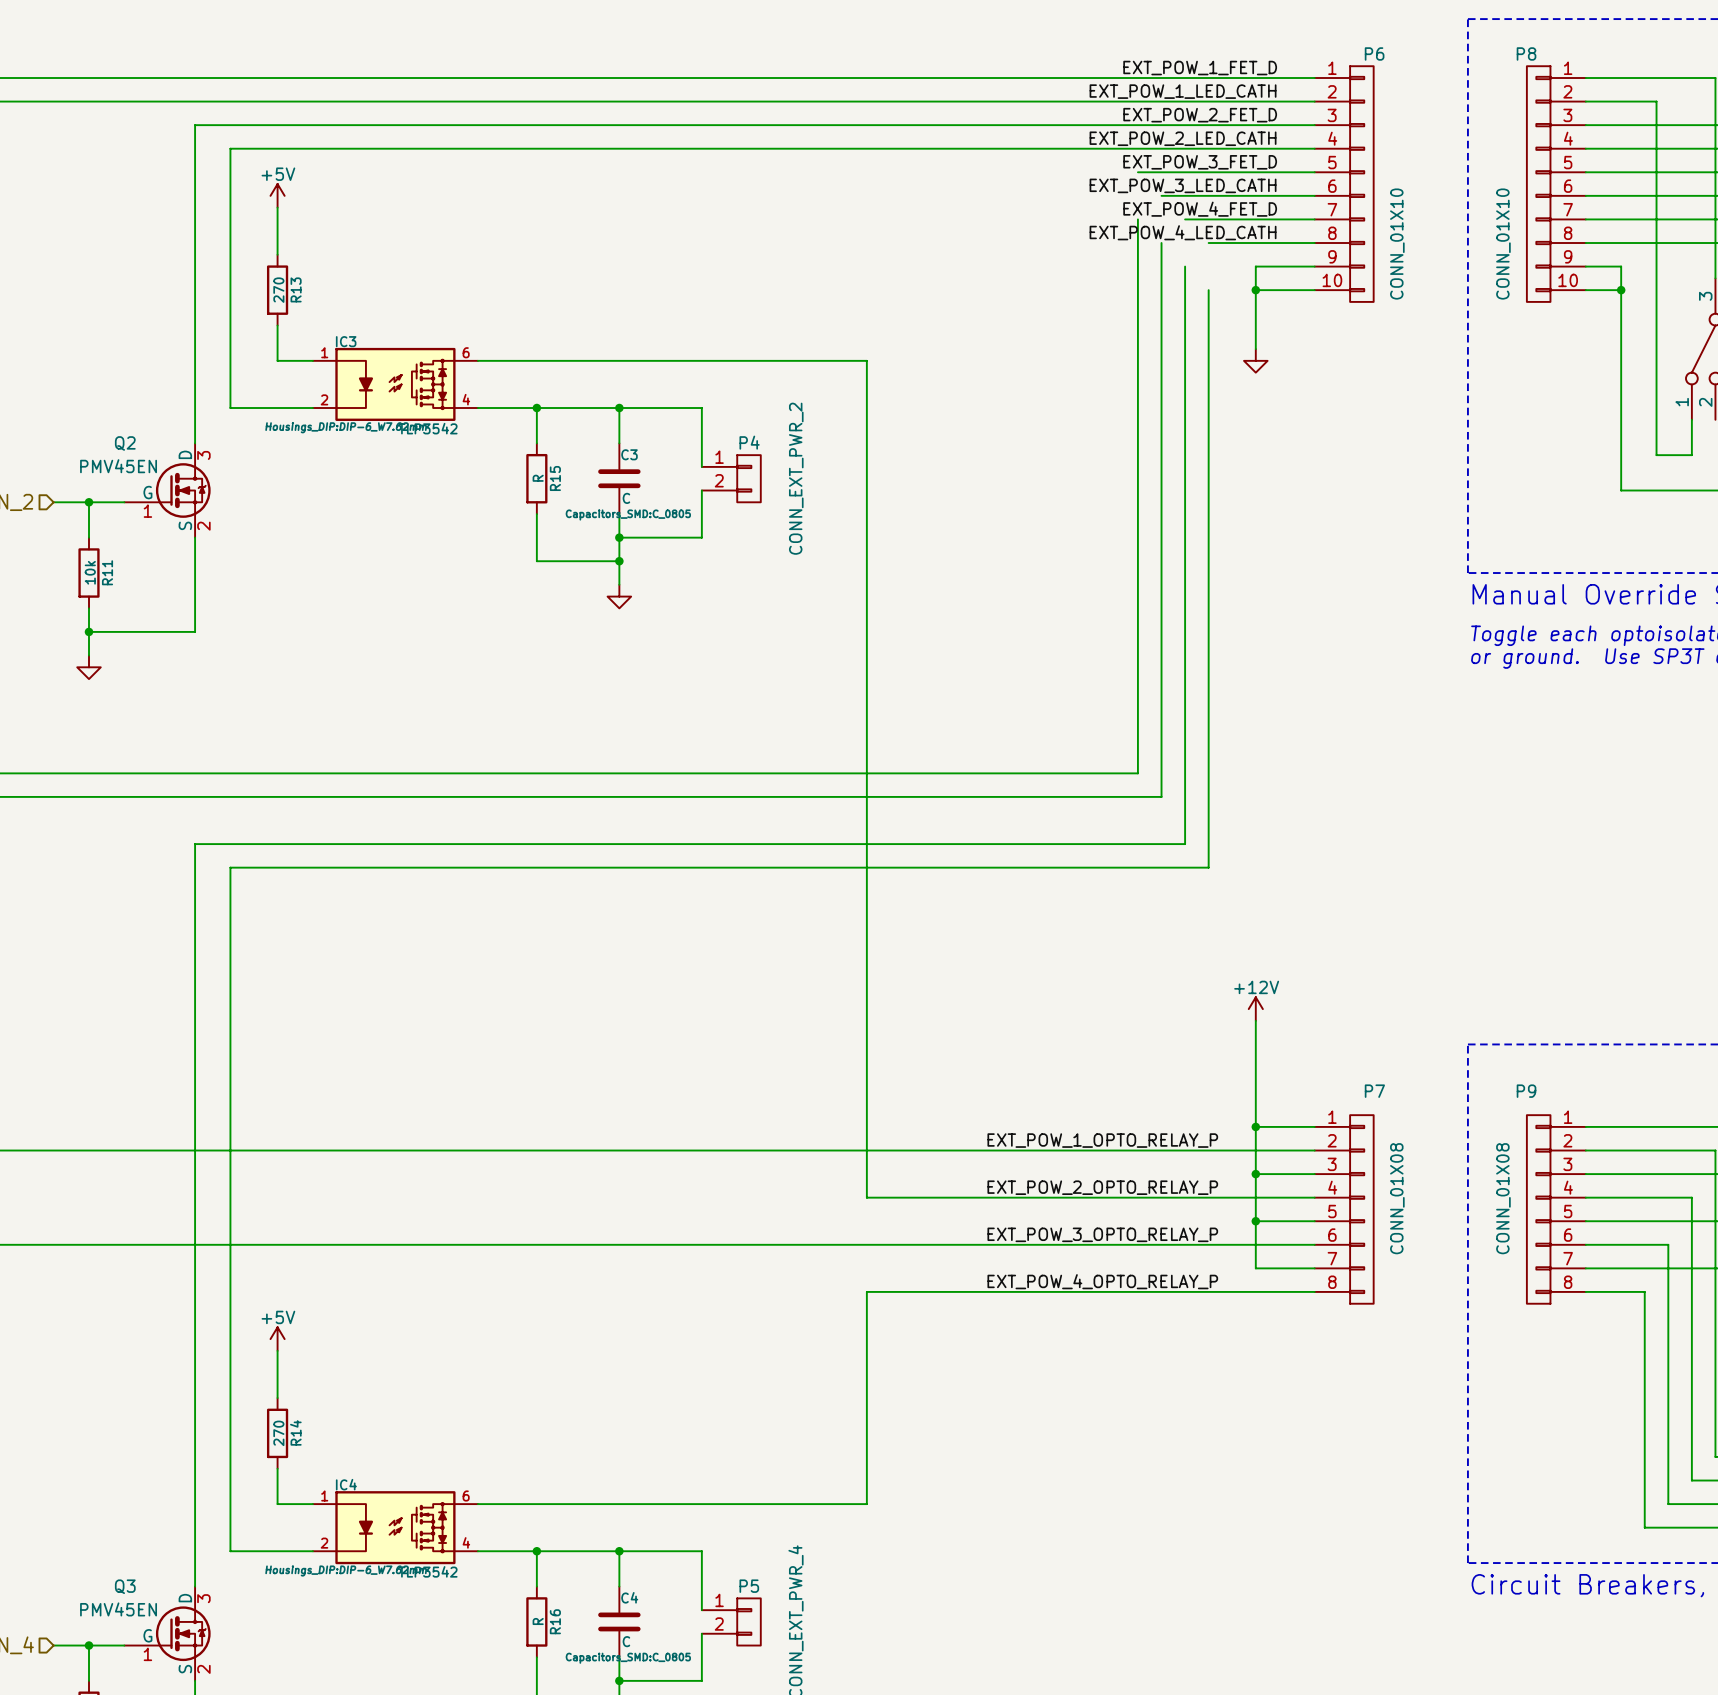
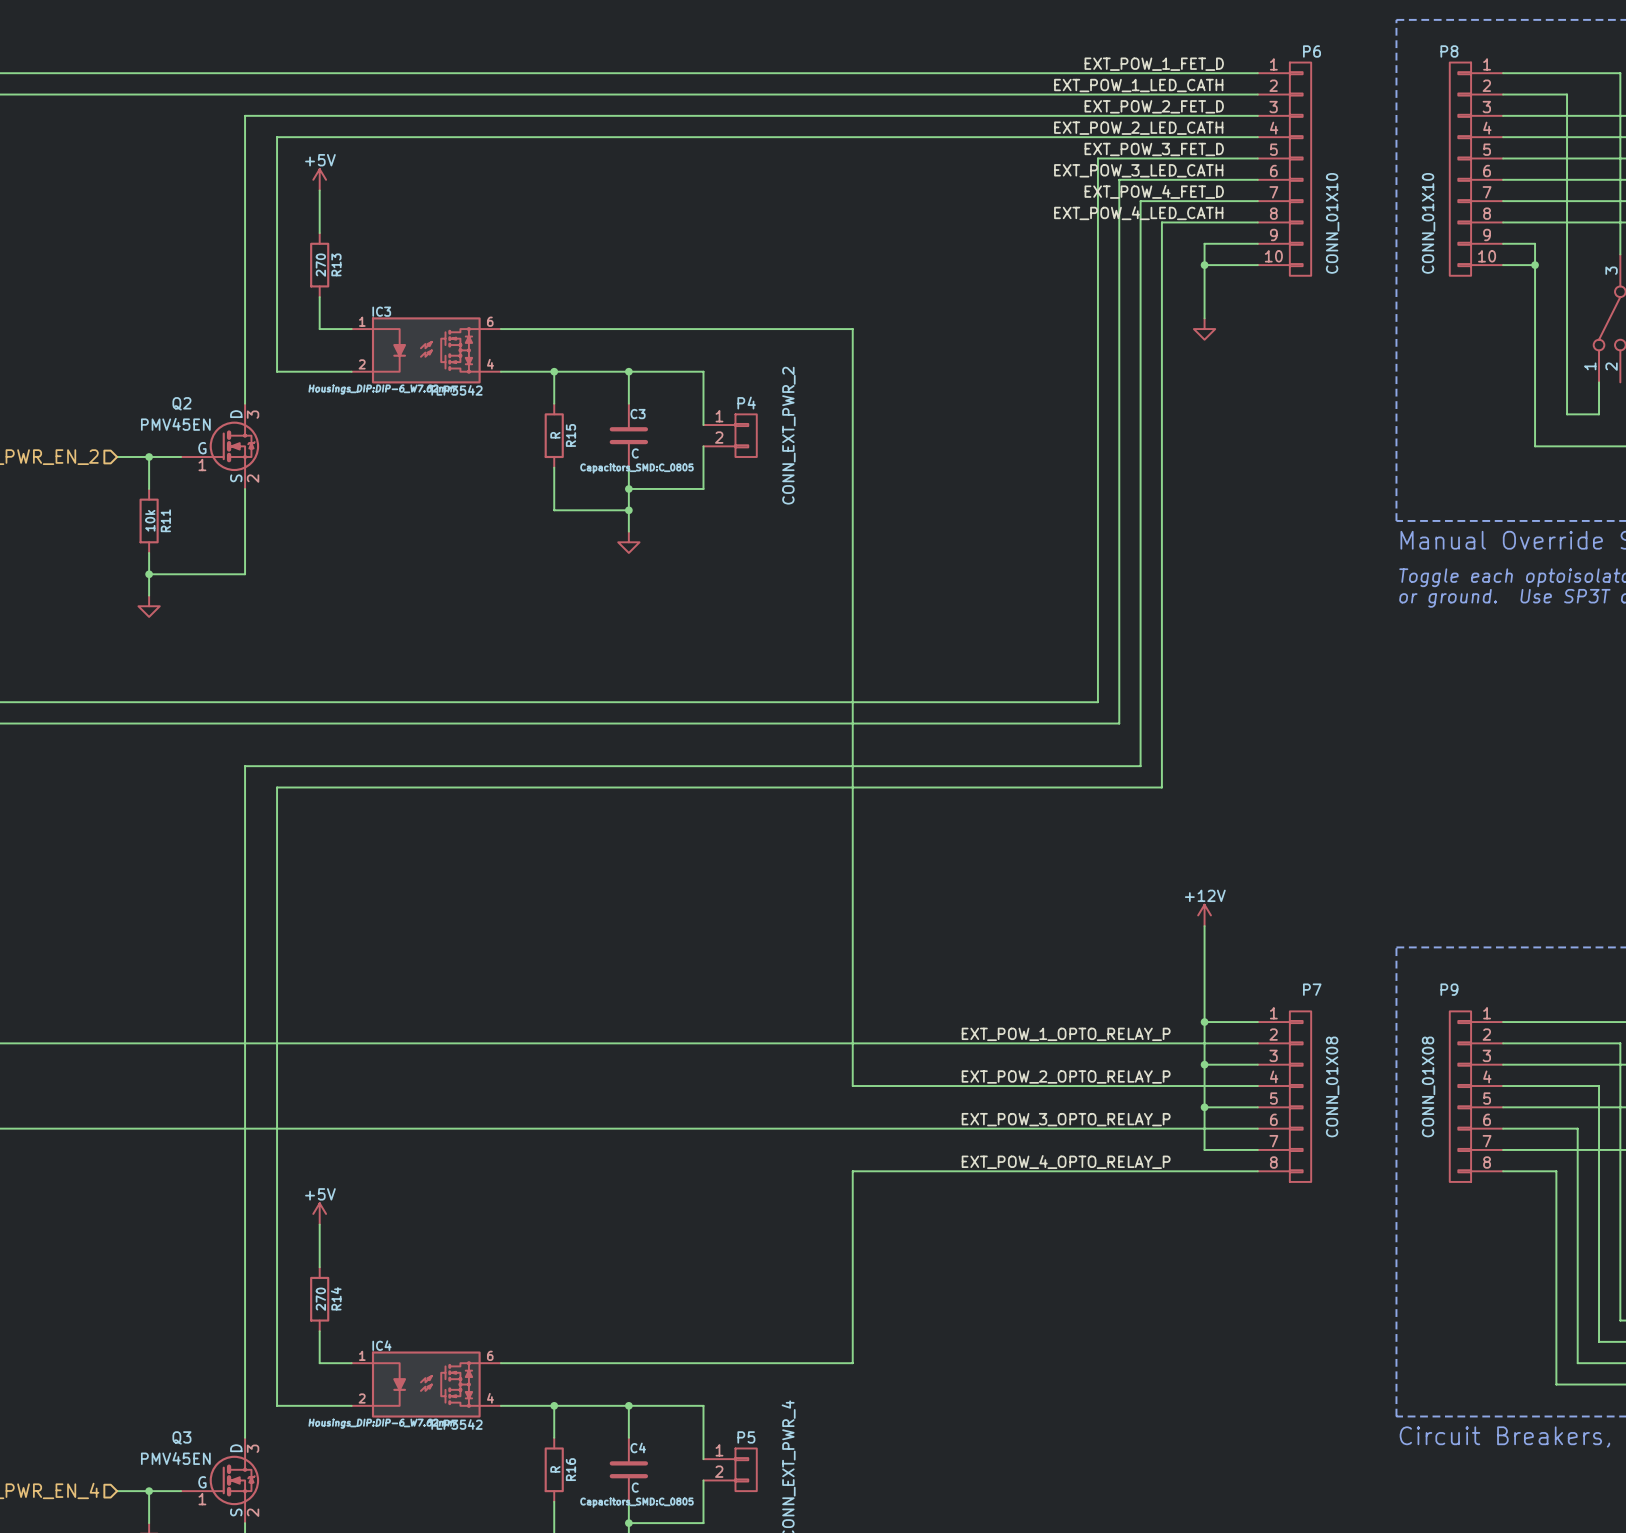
wire: none -> (1097, 158) (1097, 201)
wire: none -> (1119, 179) (1119, 222)
wire: none -> (1140, 201) (1140, 243)
wire: none -> (1161, 222) (1161, 265)

